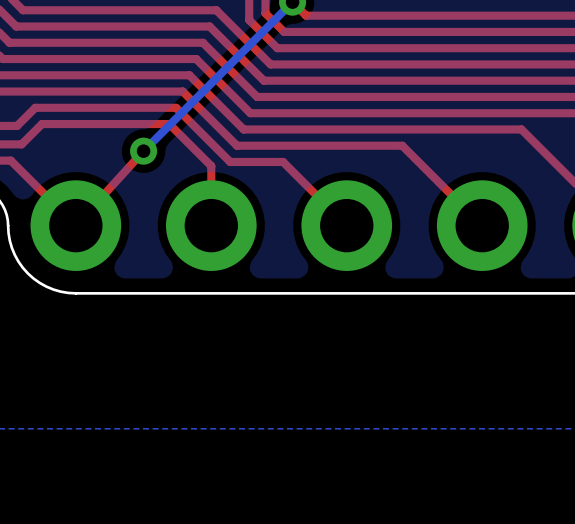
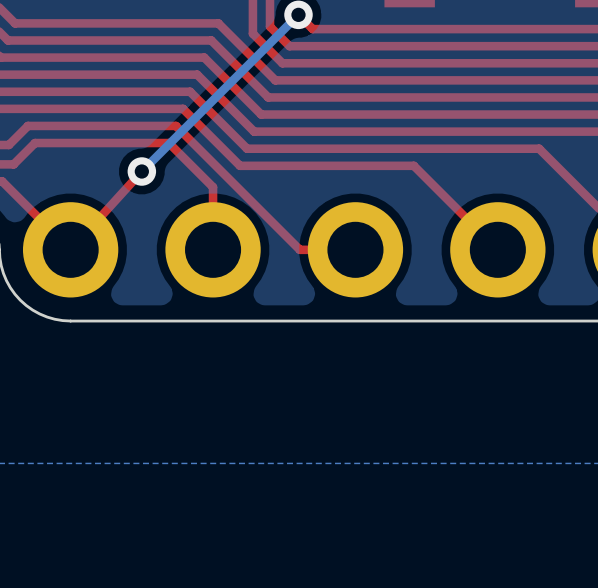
top track: (230, 161) (283, 161) (346, 225) -> (232, 182) (299, 249) (355, 249)

